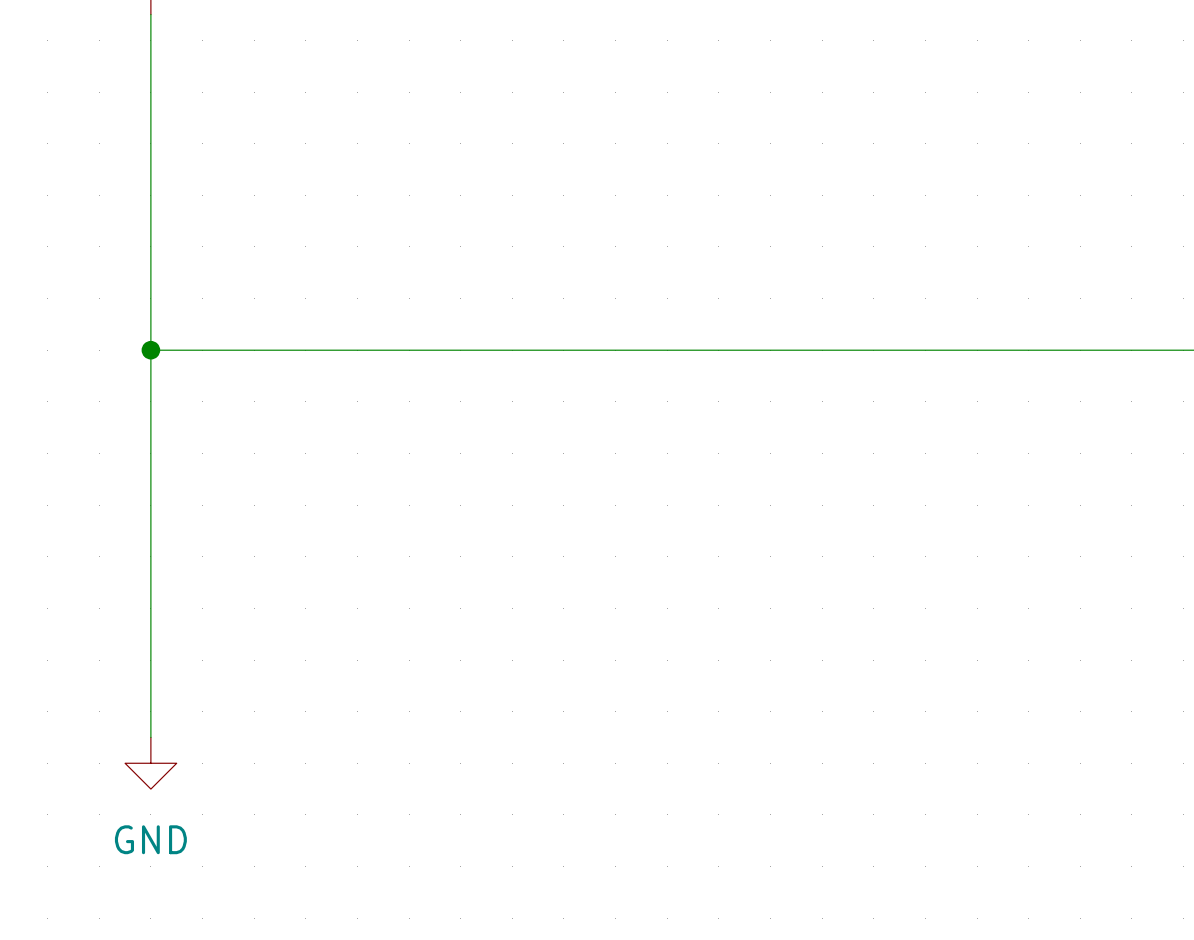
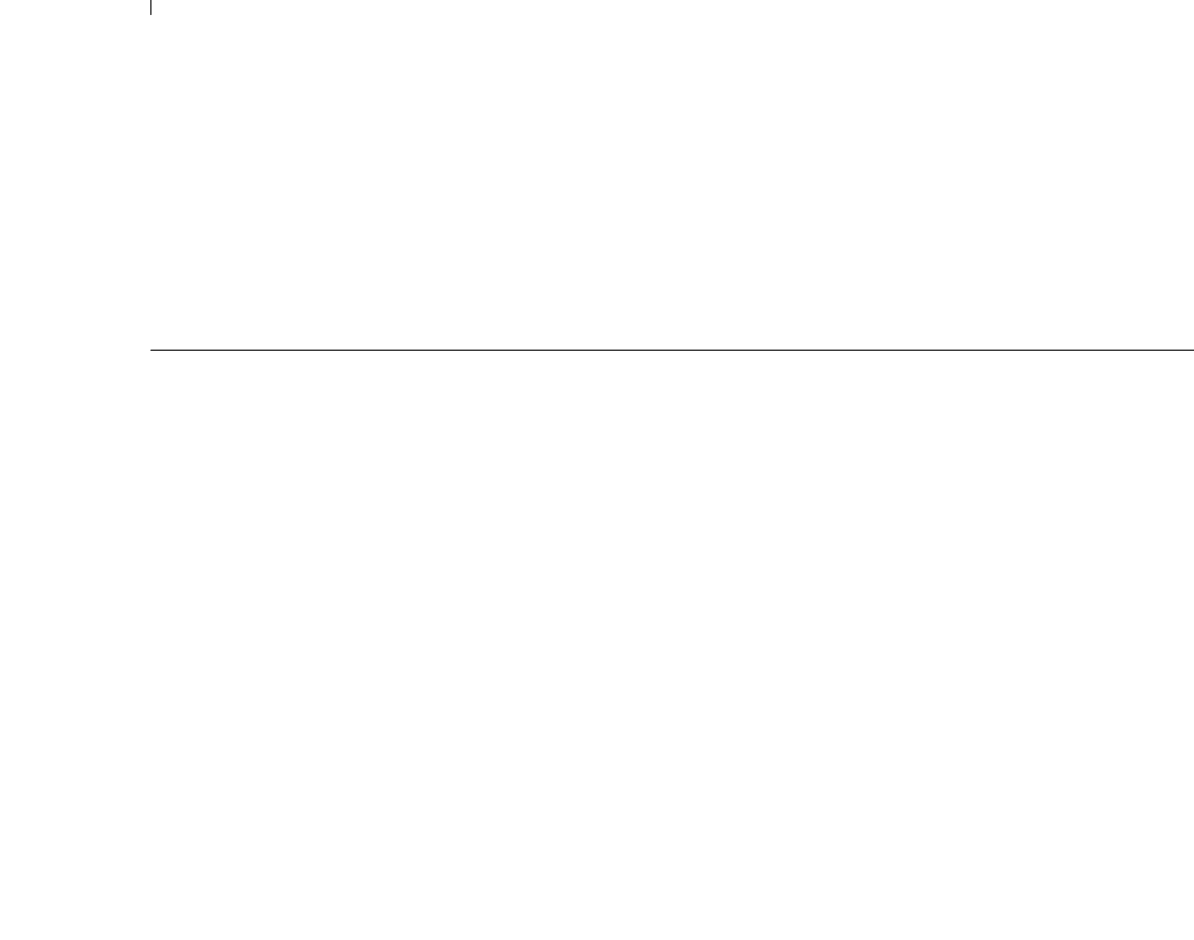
wire: (150, 14) (150, 737) -> none
junction: (150, 350) -> none
power symbol: GND (150, 763) -> none

